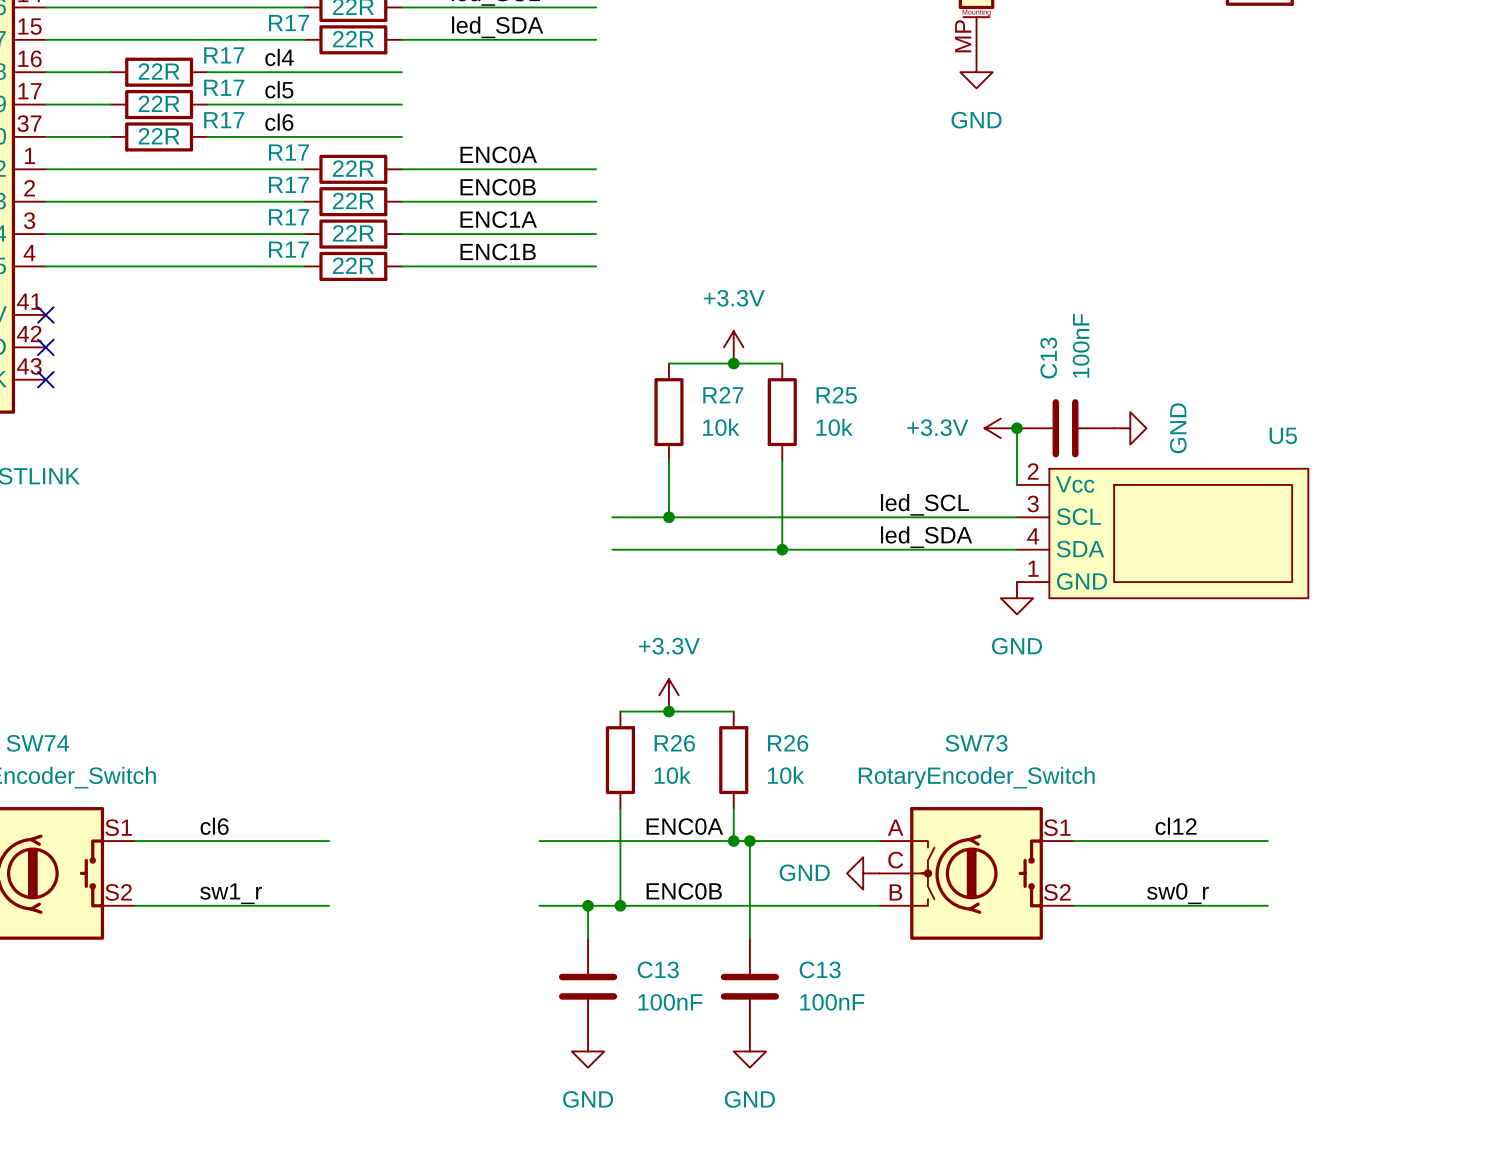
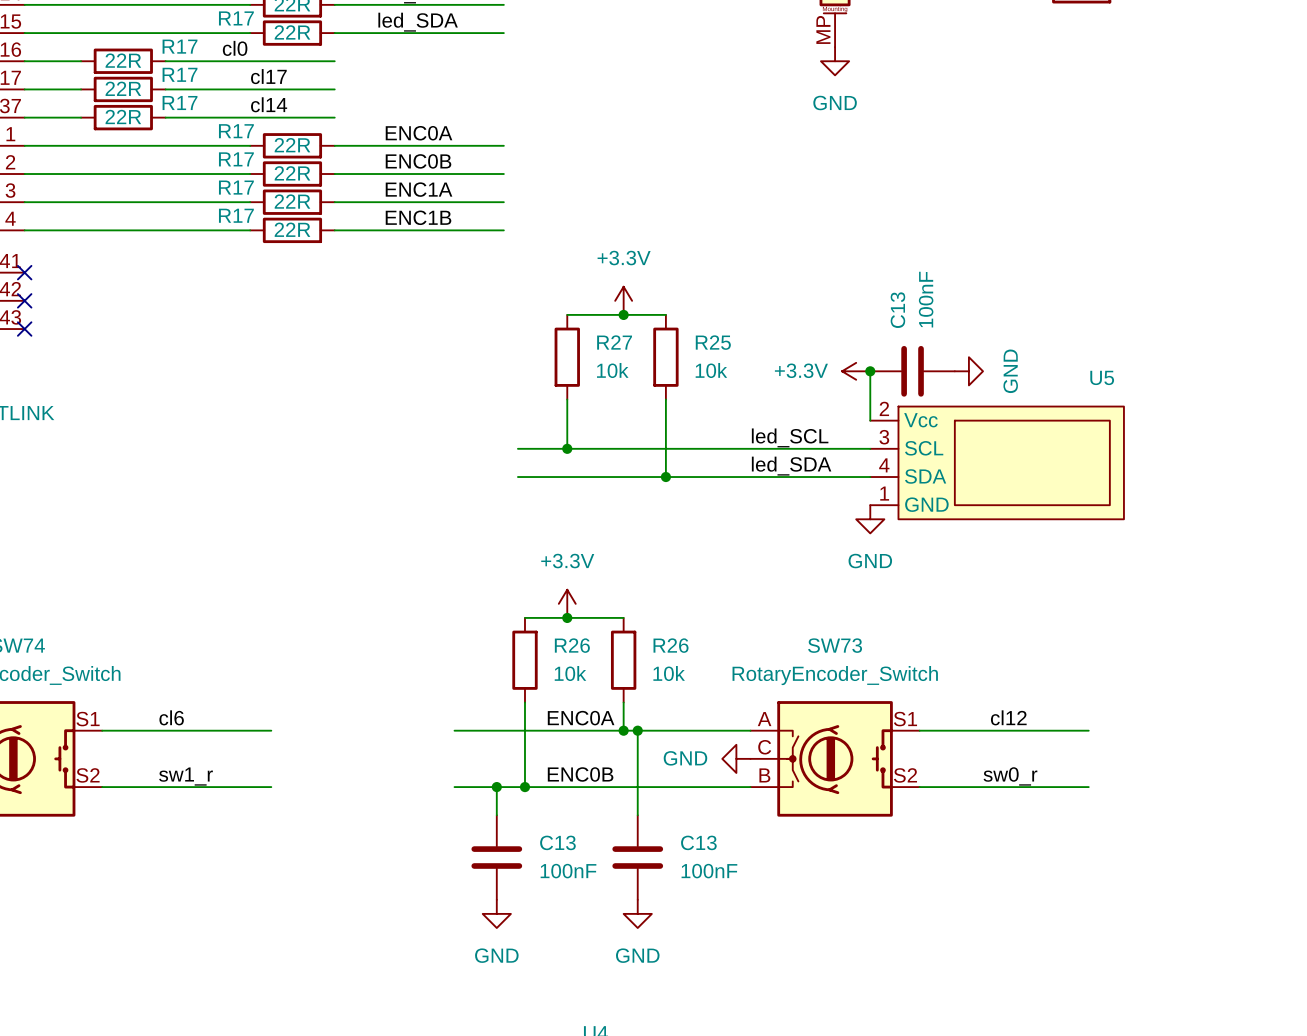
label: cl4 (279, 57) -> cl0 (235, 48)
label: cl5 (279, 89) -> none
label: none -> cl17 (268, 76)
label: cl6 (279, 122) -> none
label: none -> cl14 (269, 104)

